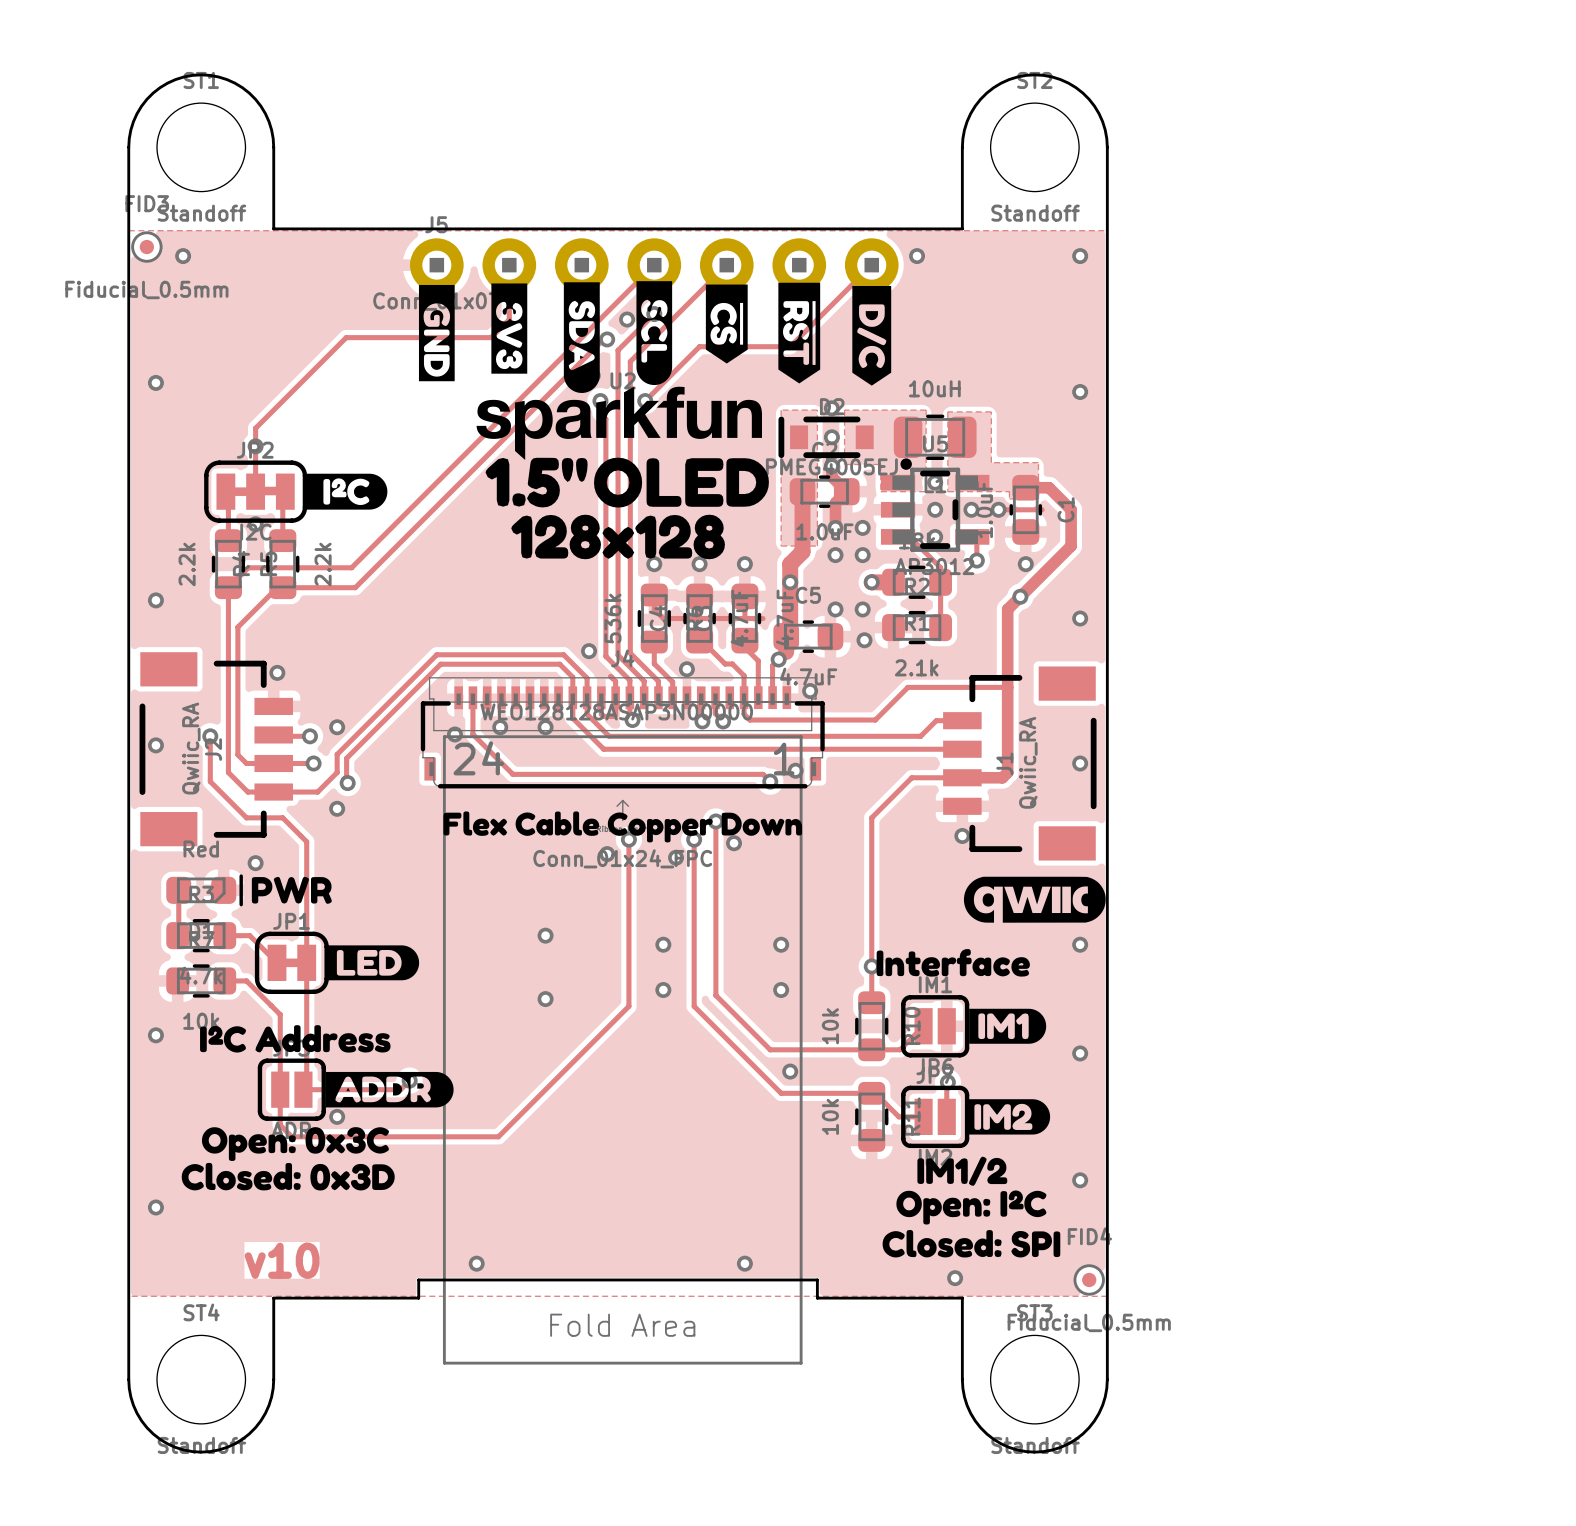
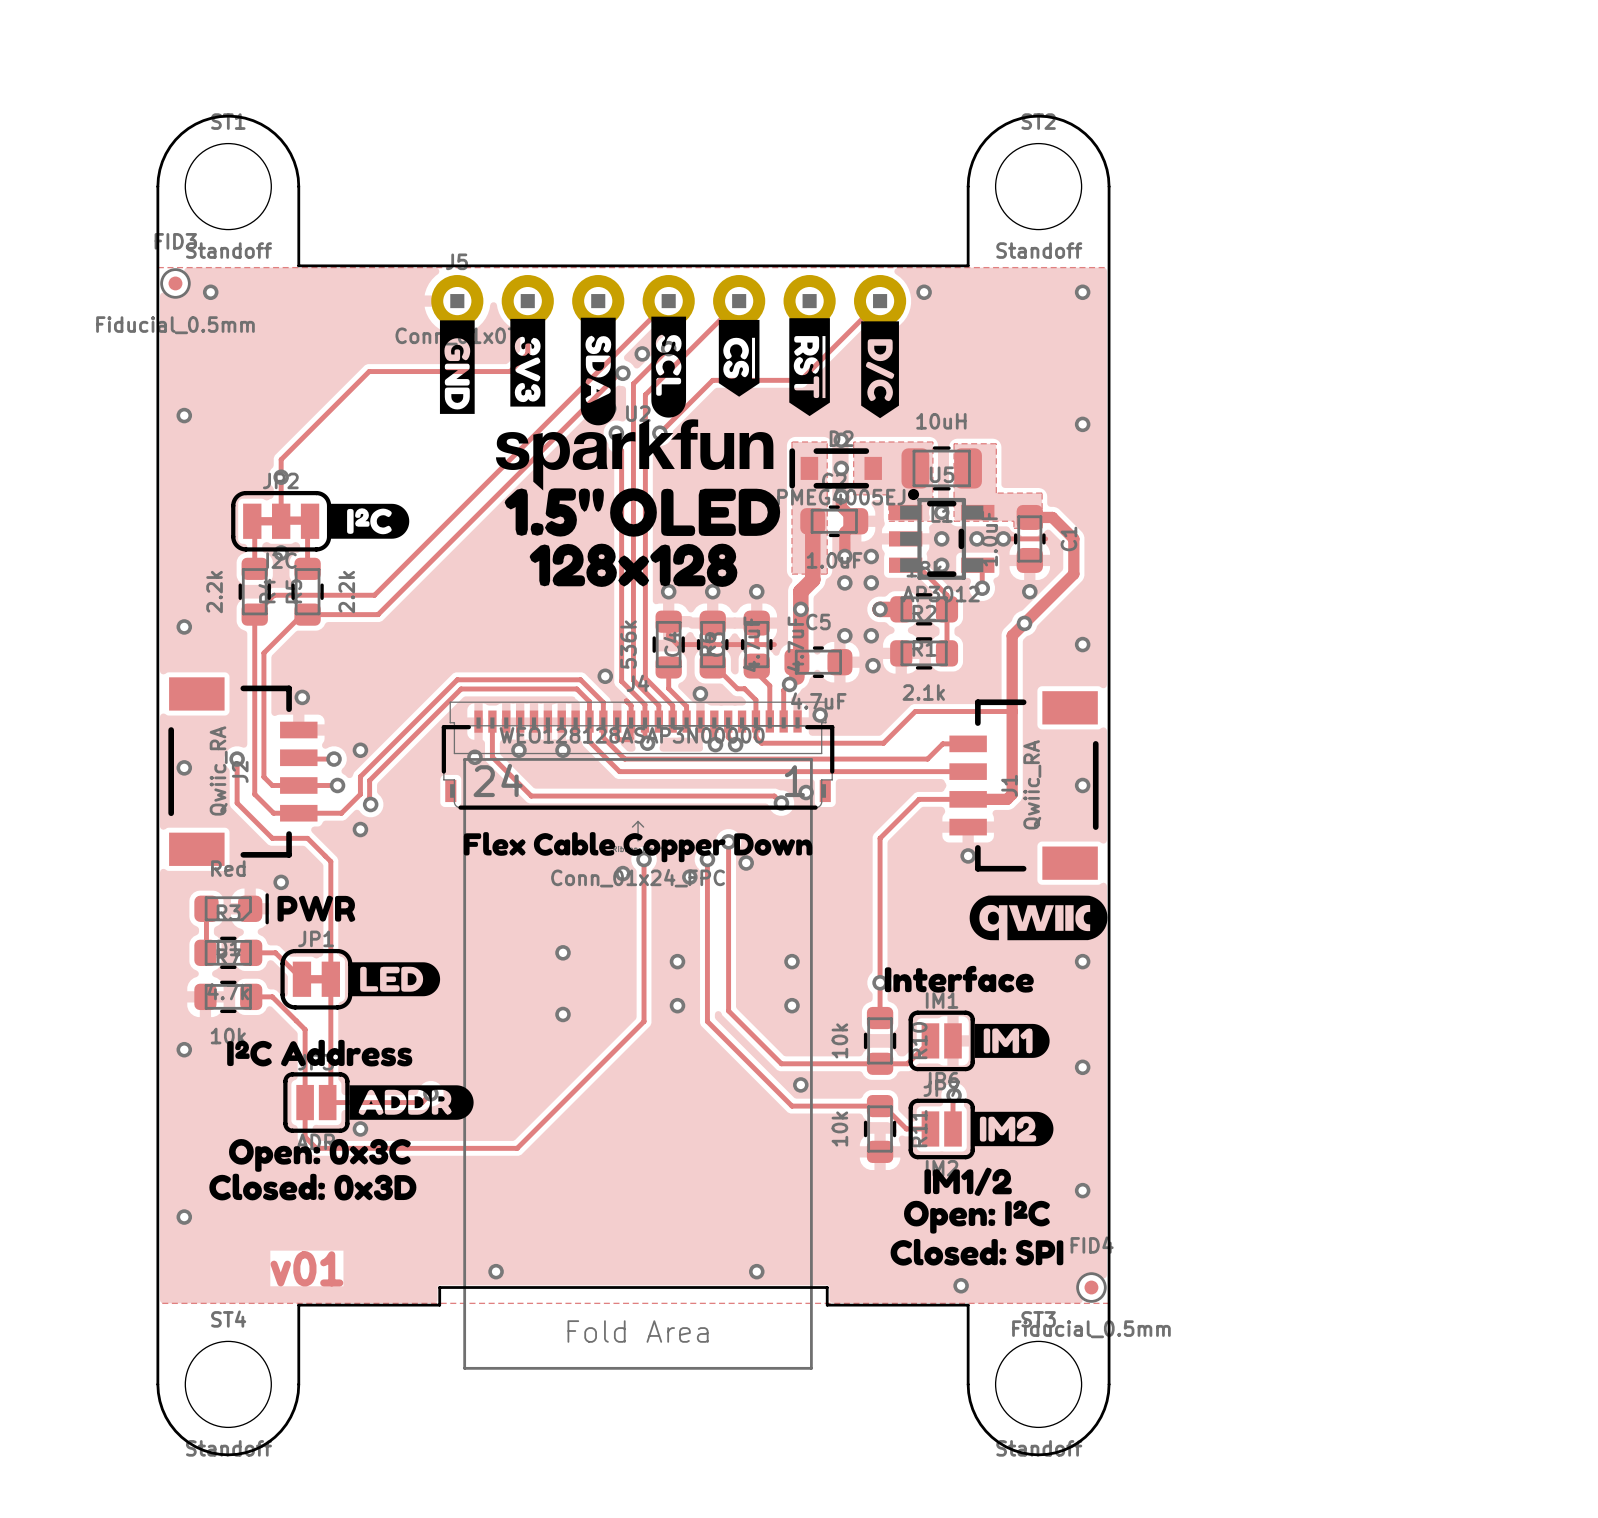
text: v10 (282, 1260) -> v01 (306, 1268)

